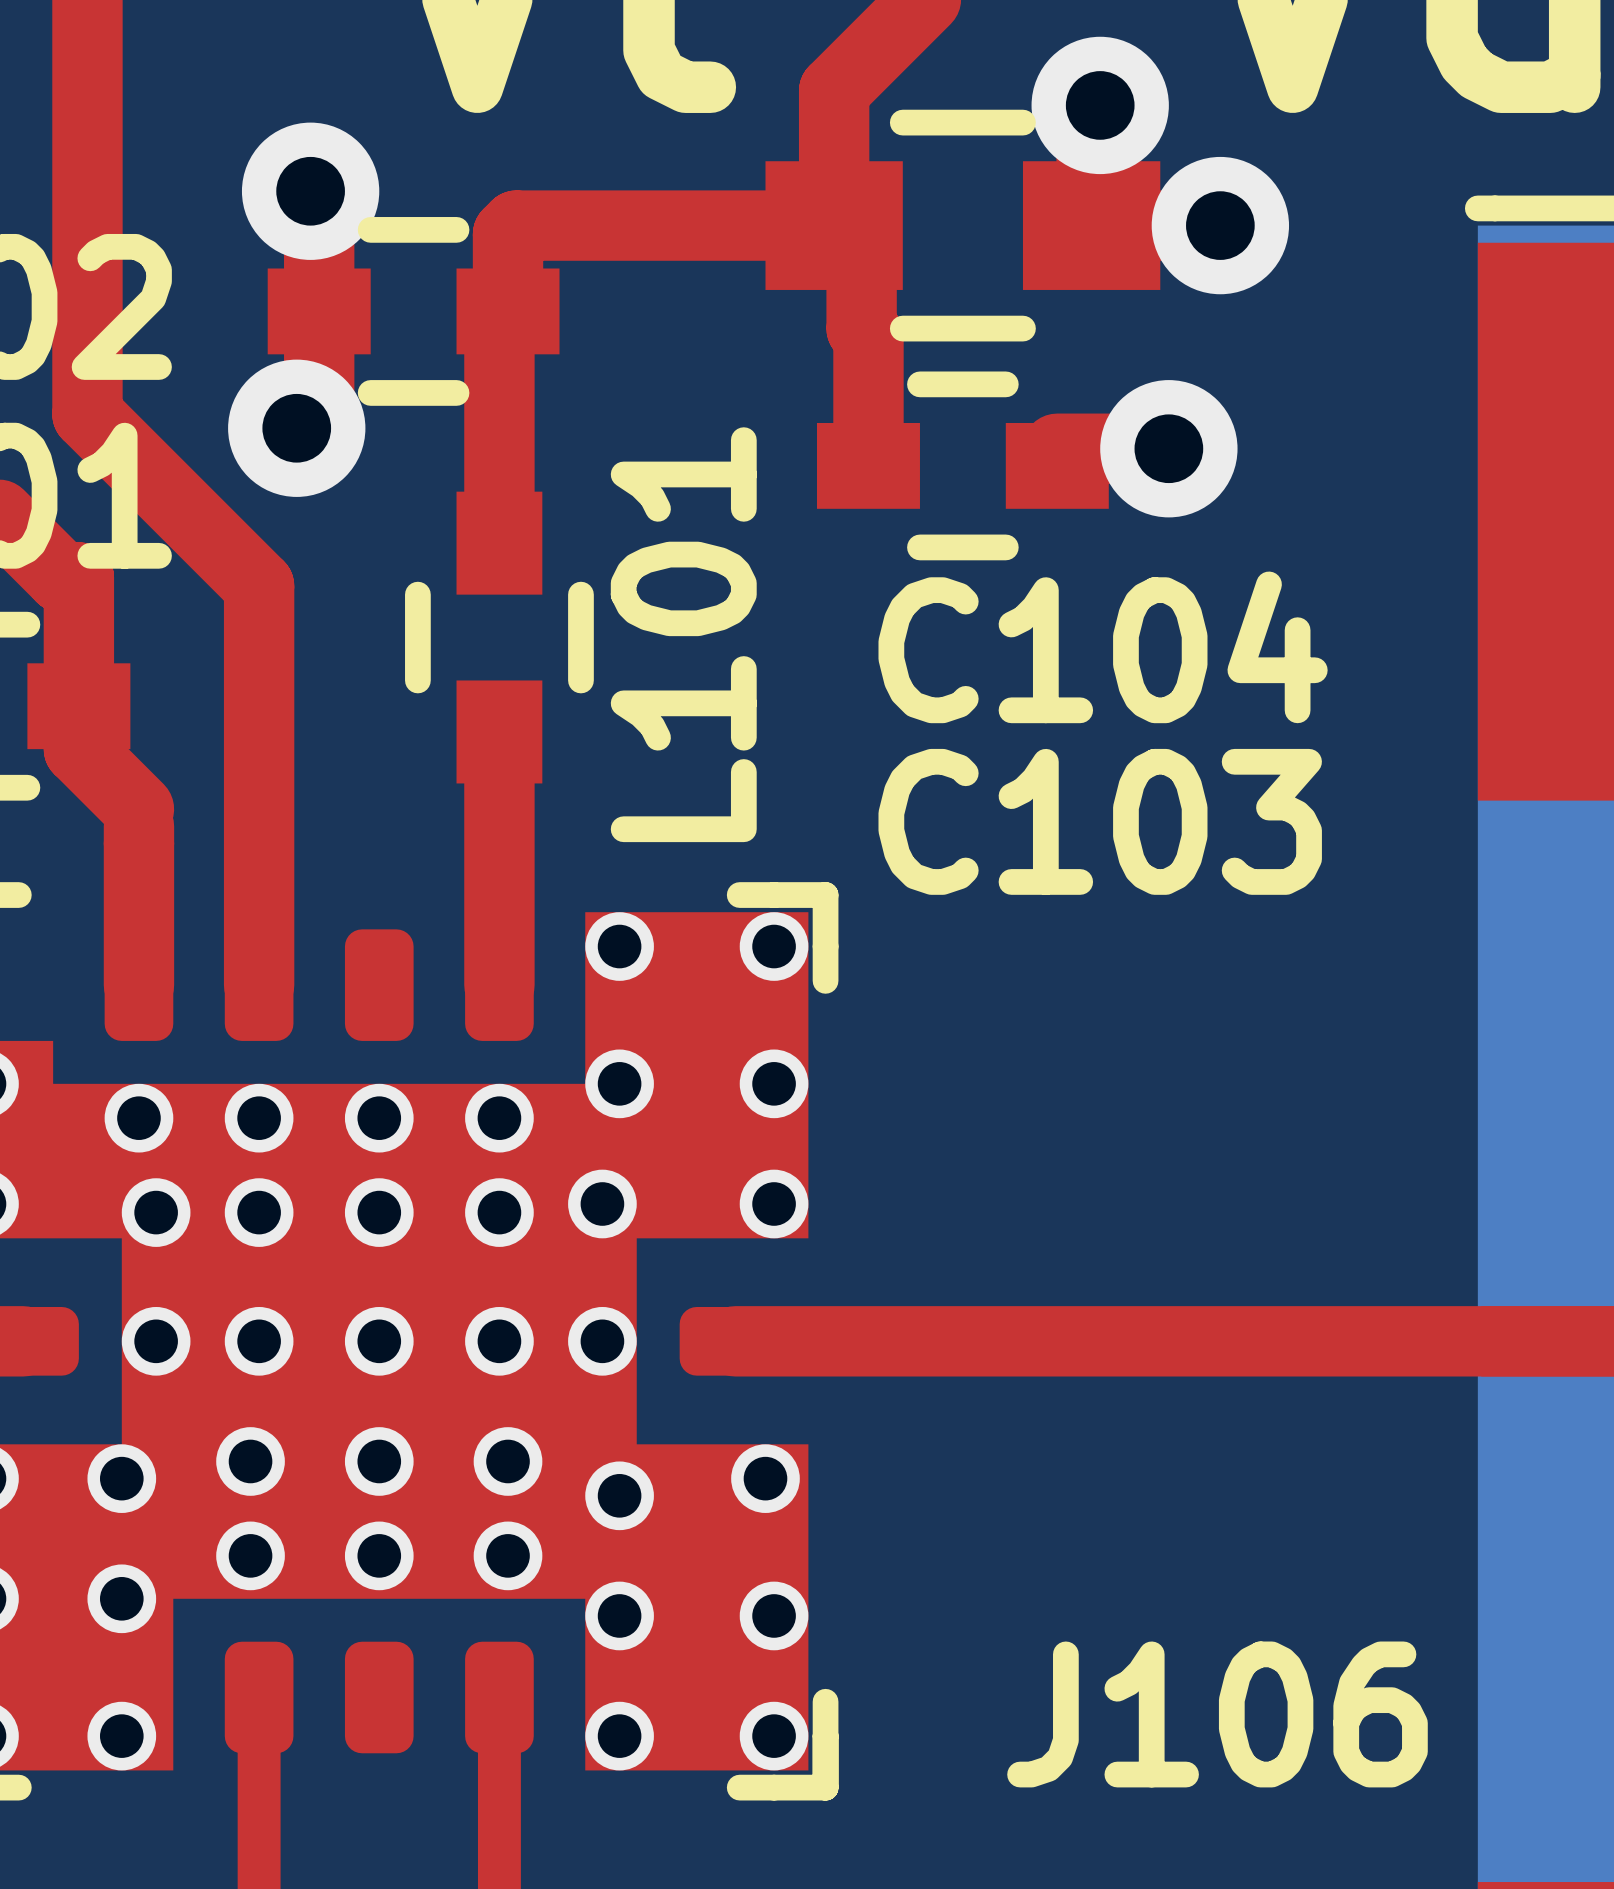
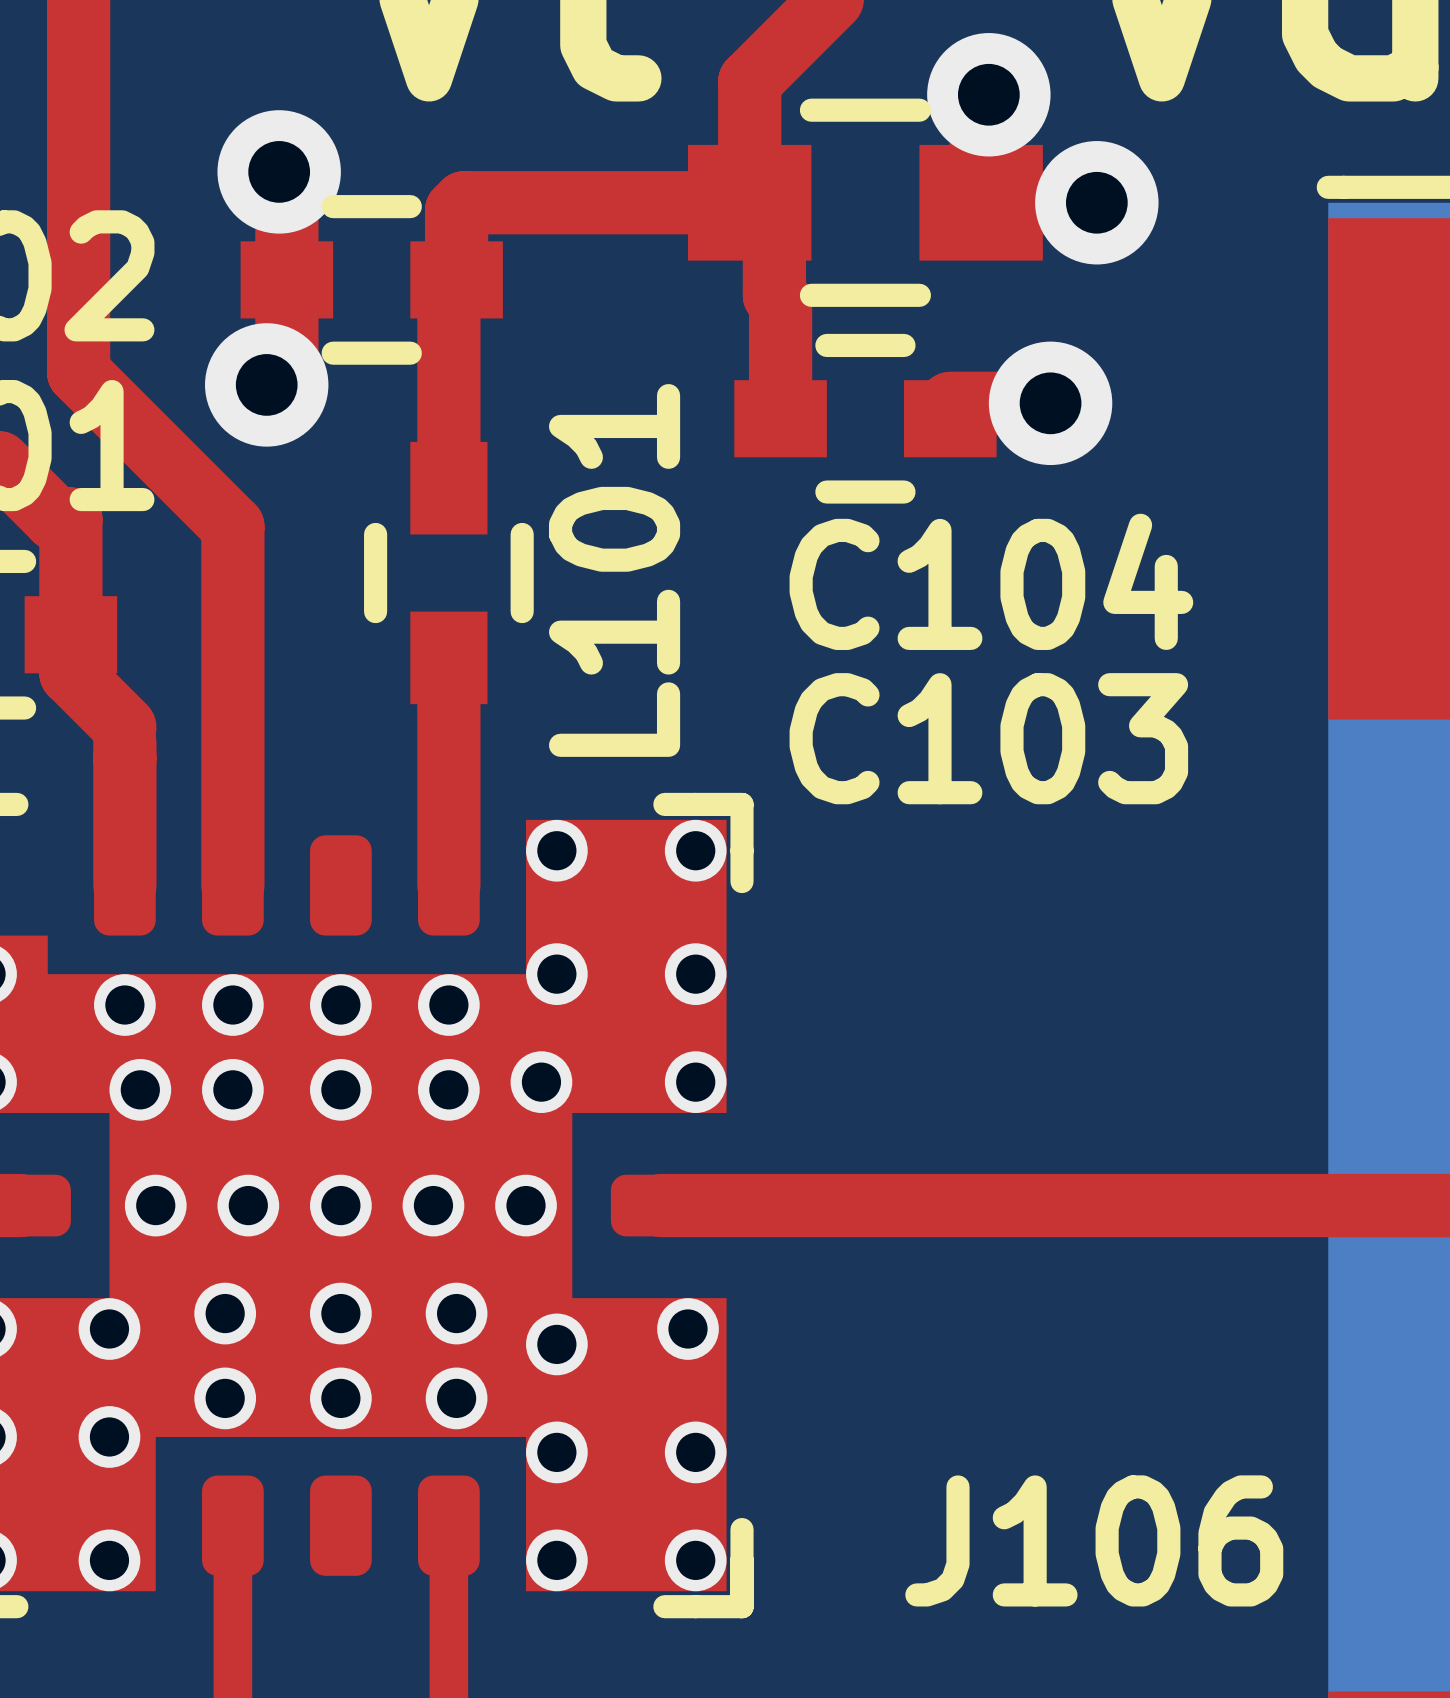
via position: (156, 1341) -> (155, 1205)
via position: (259, 1341) -> (248, 1205)
via position: (499, 1341) -> (433, 1205)
via position: (602, 1341) -> (526, 1205)

